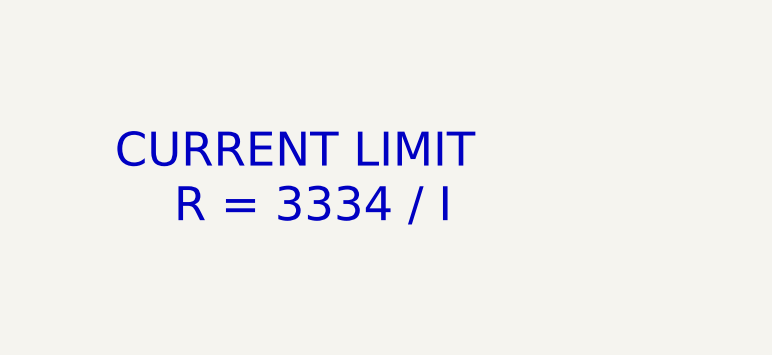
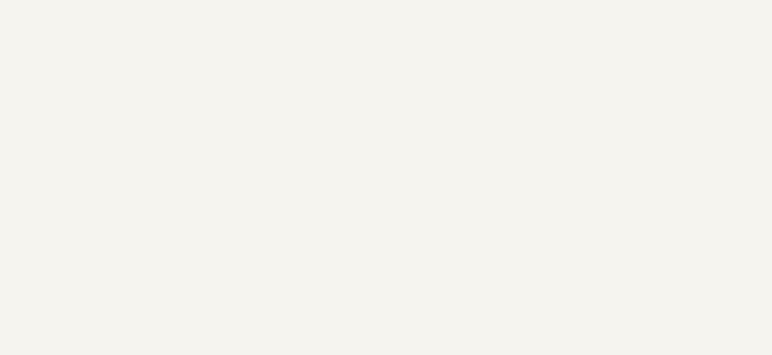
text: CURRENT LIMIT (296, 148) -> none
text: R = 3334 / I (313, 205) -> none

